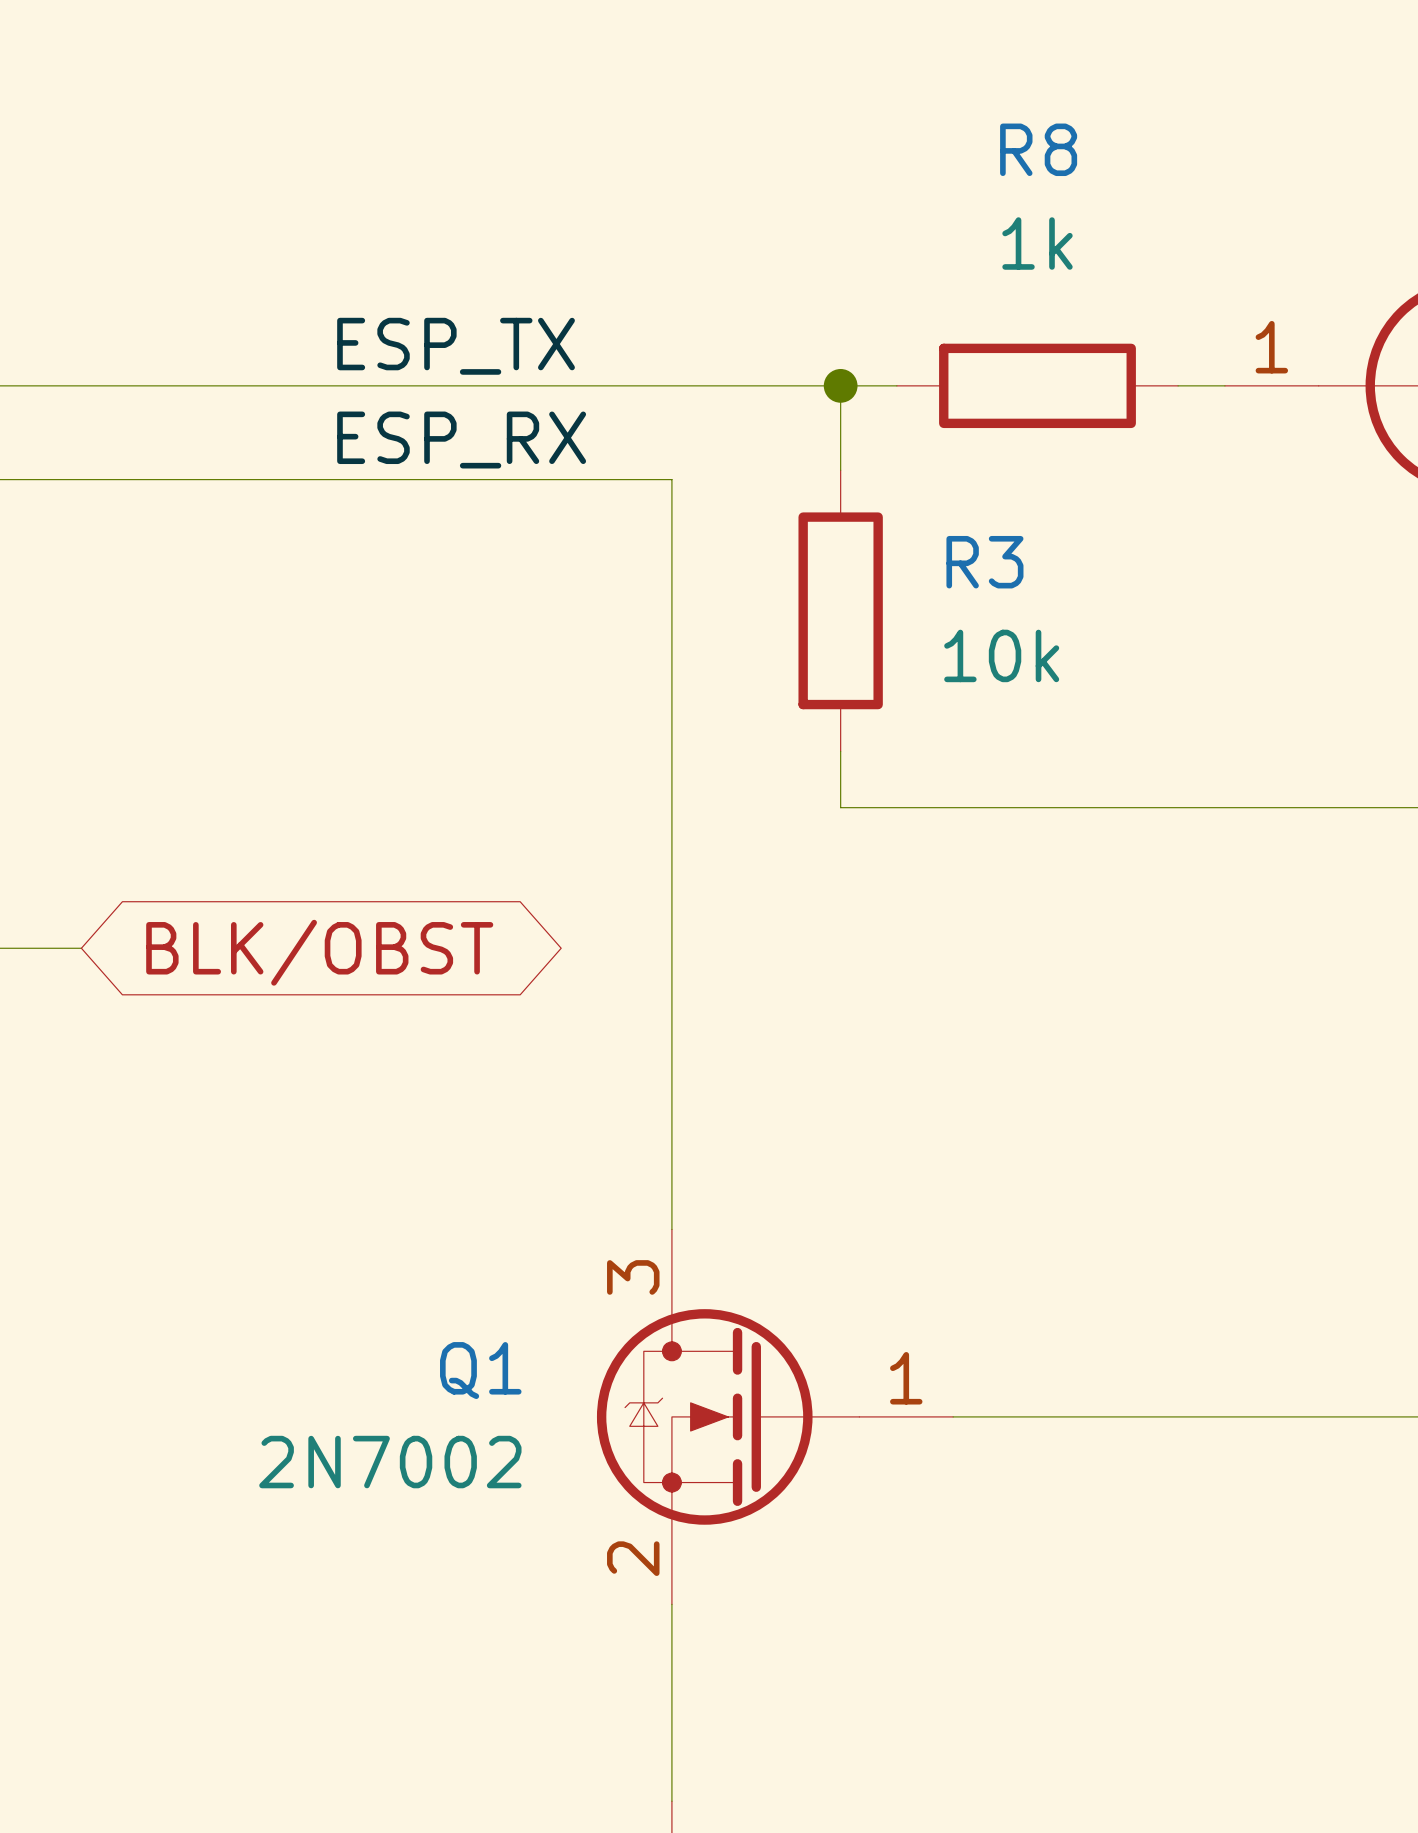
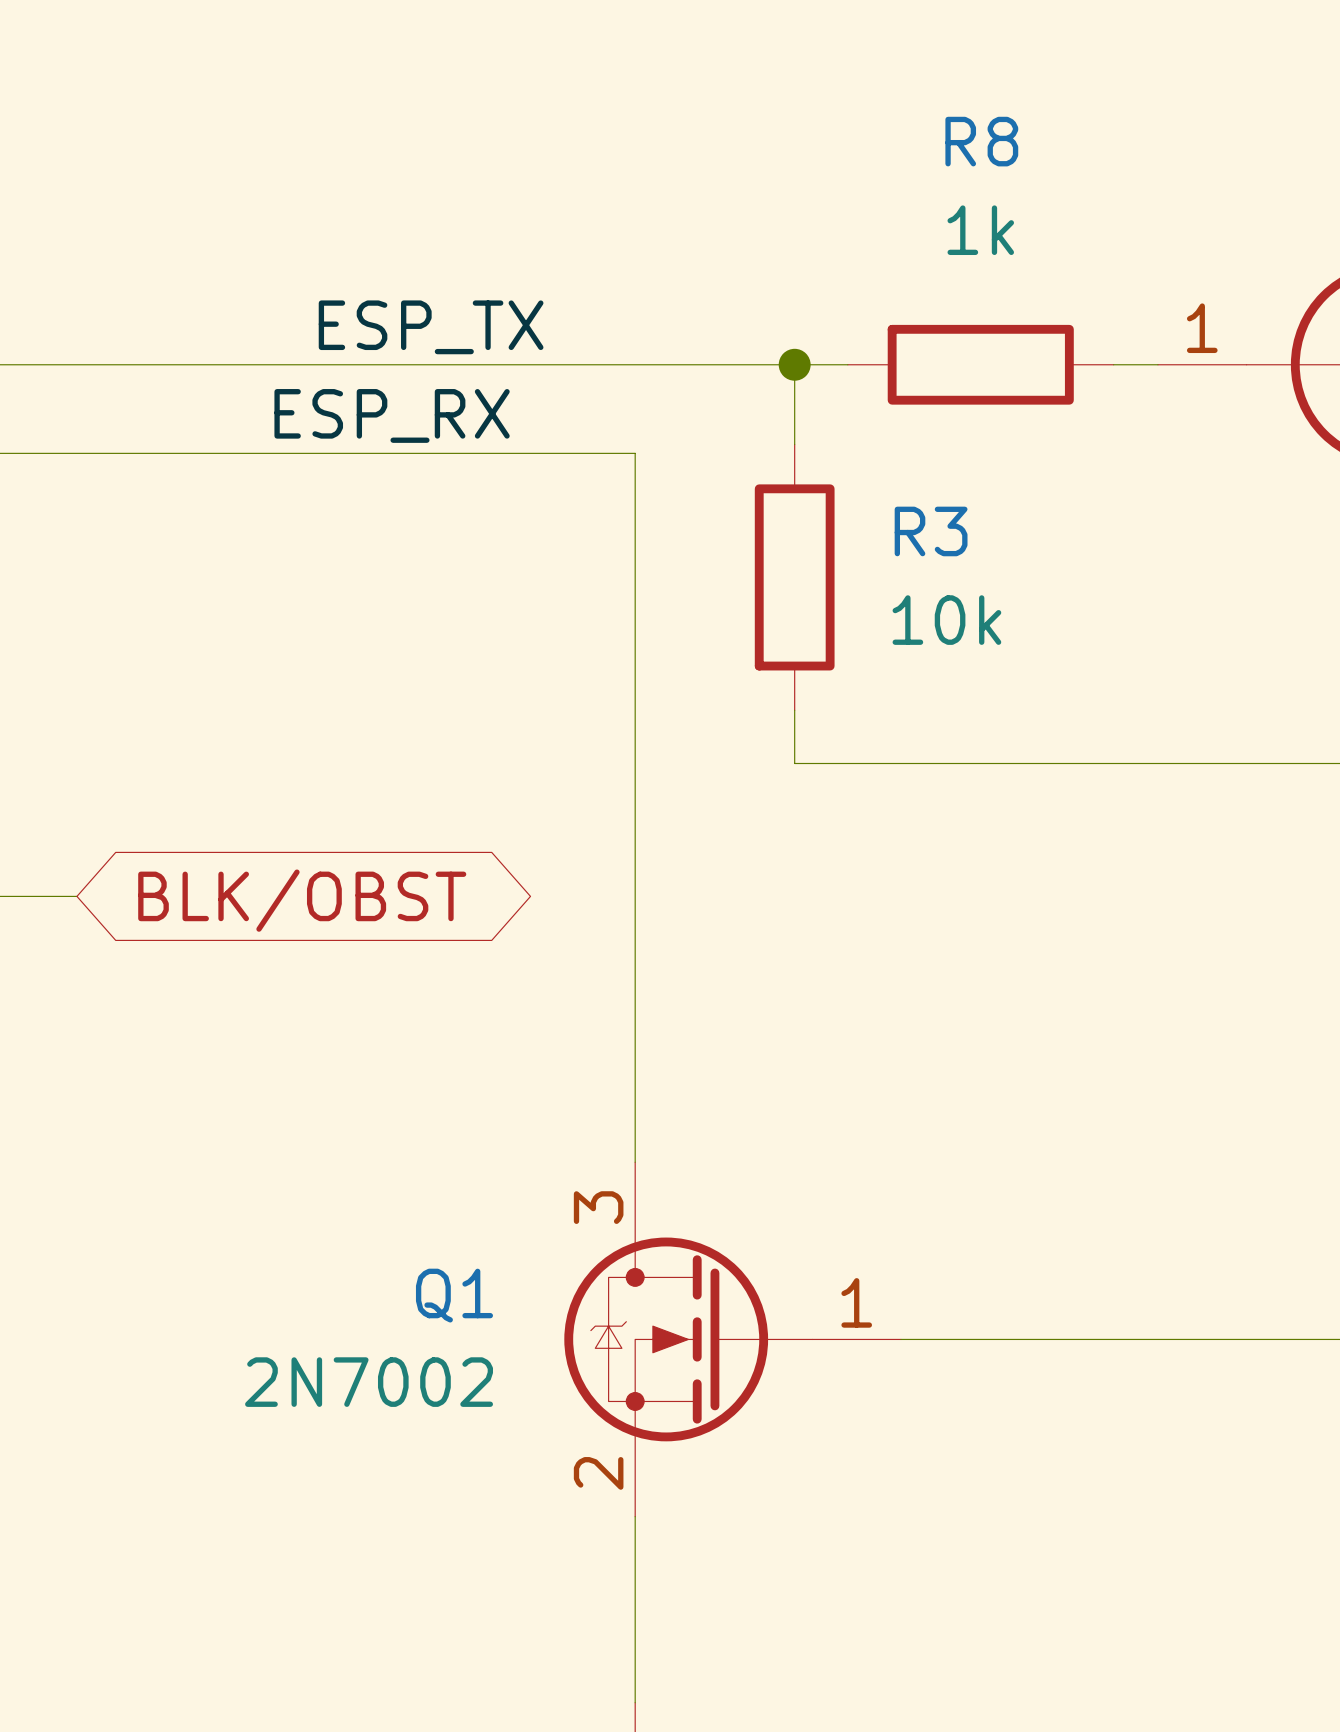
label position: ESP_RX (461, 440) -> ESP_RX (392, 415)

